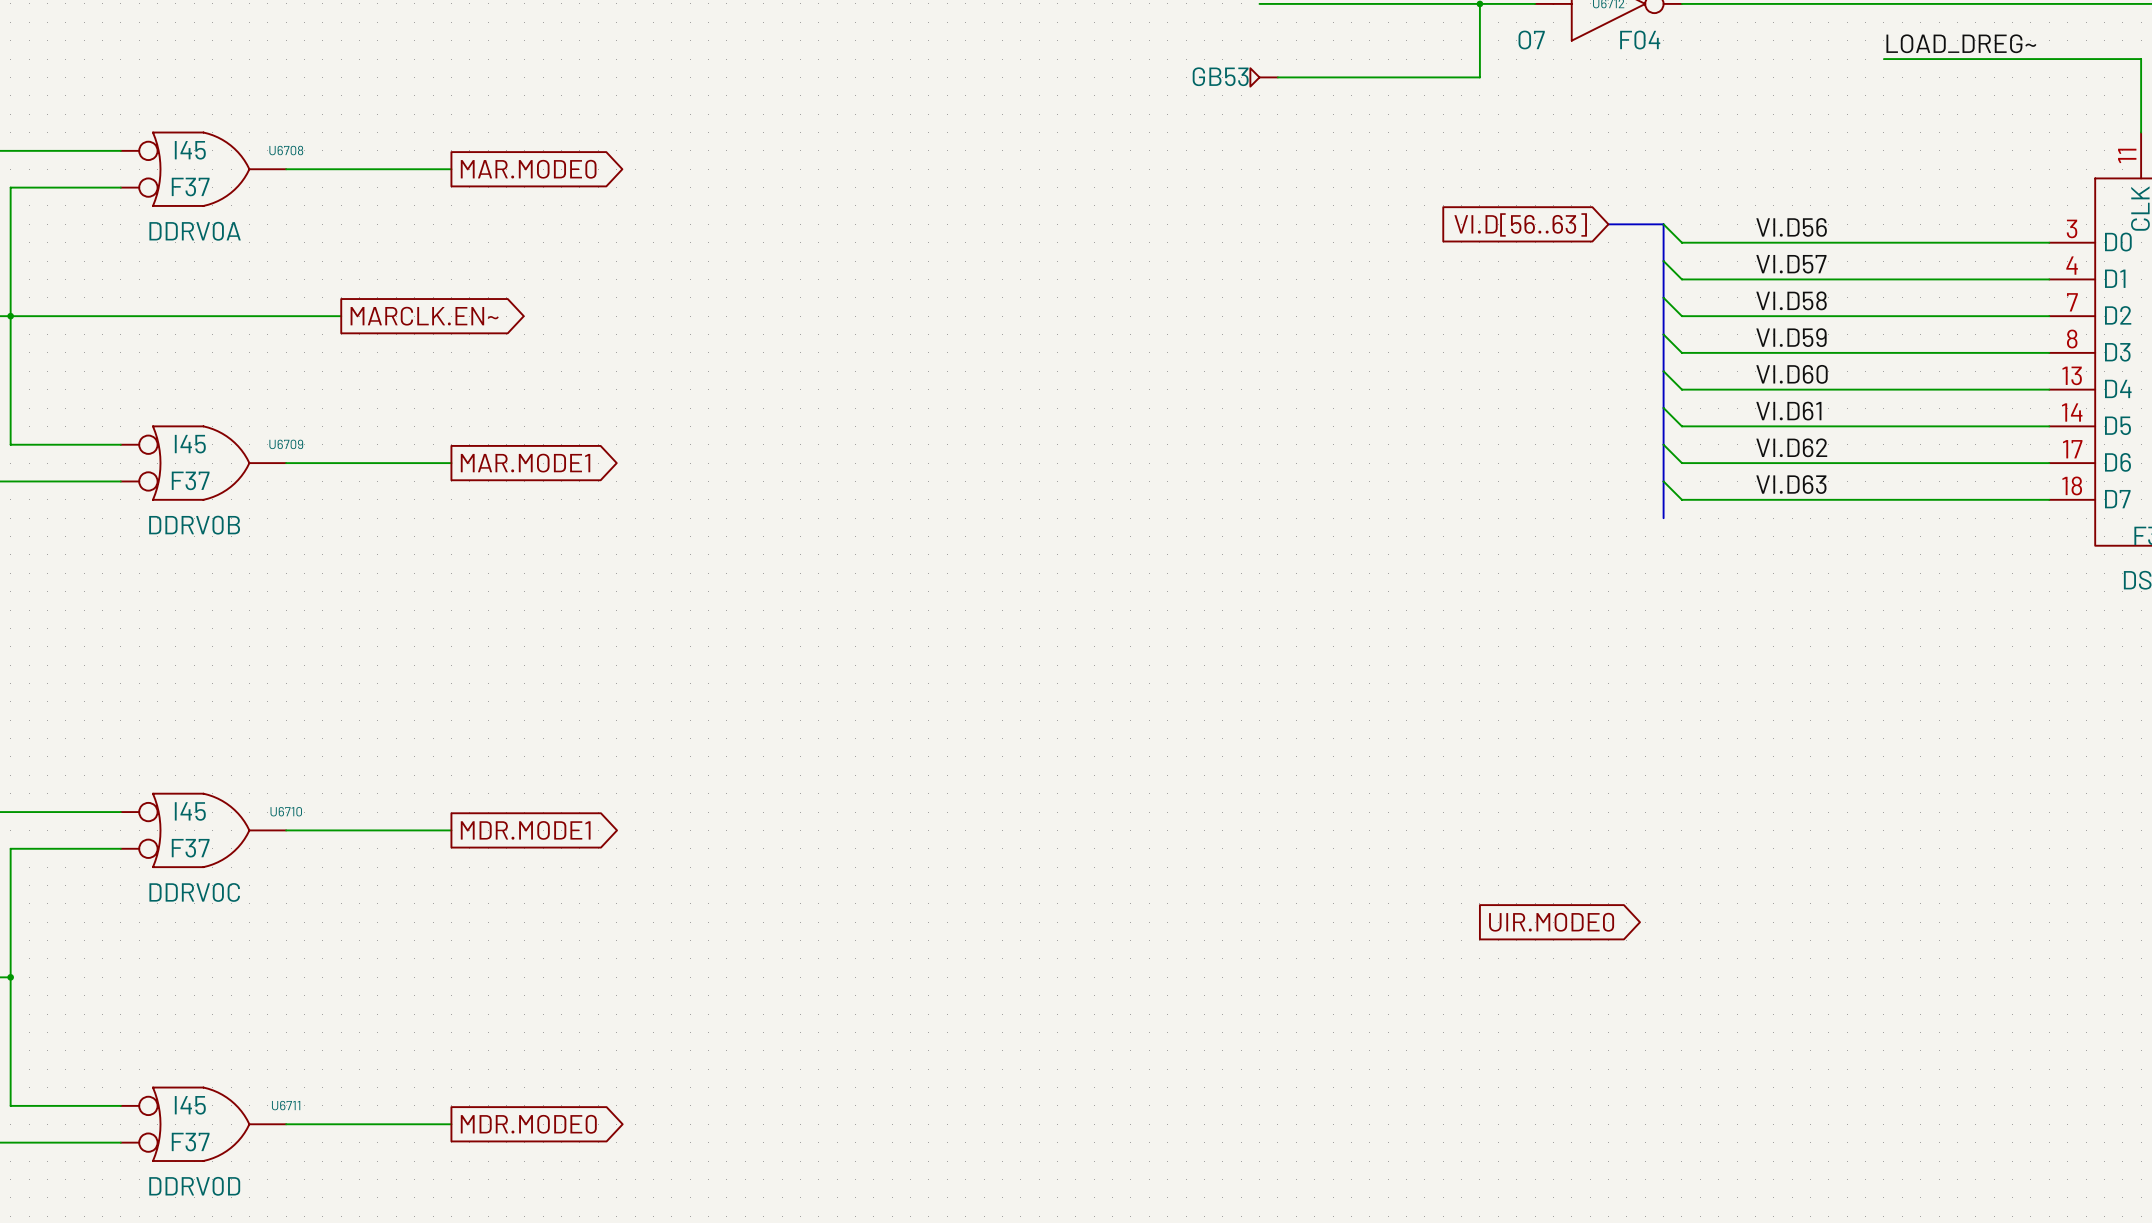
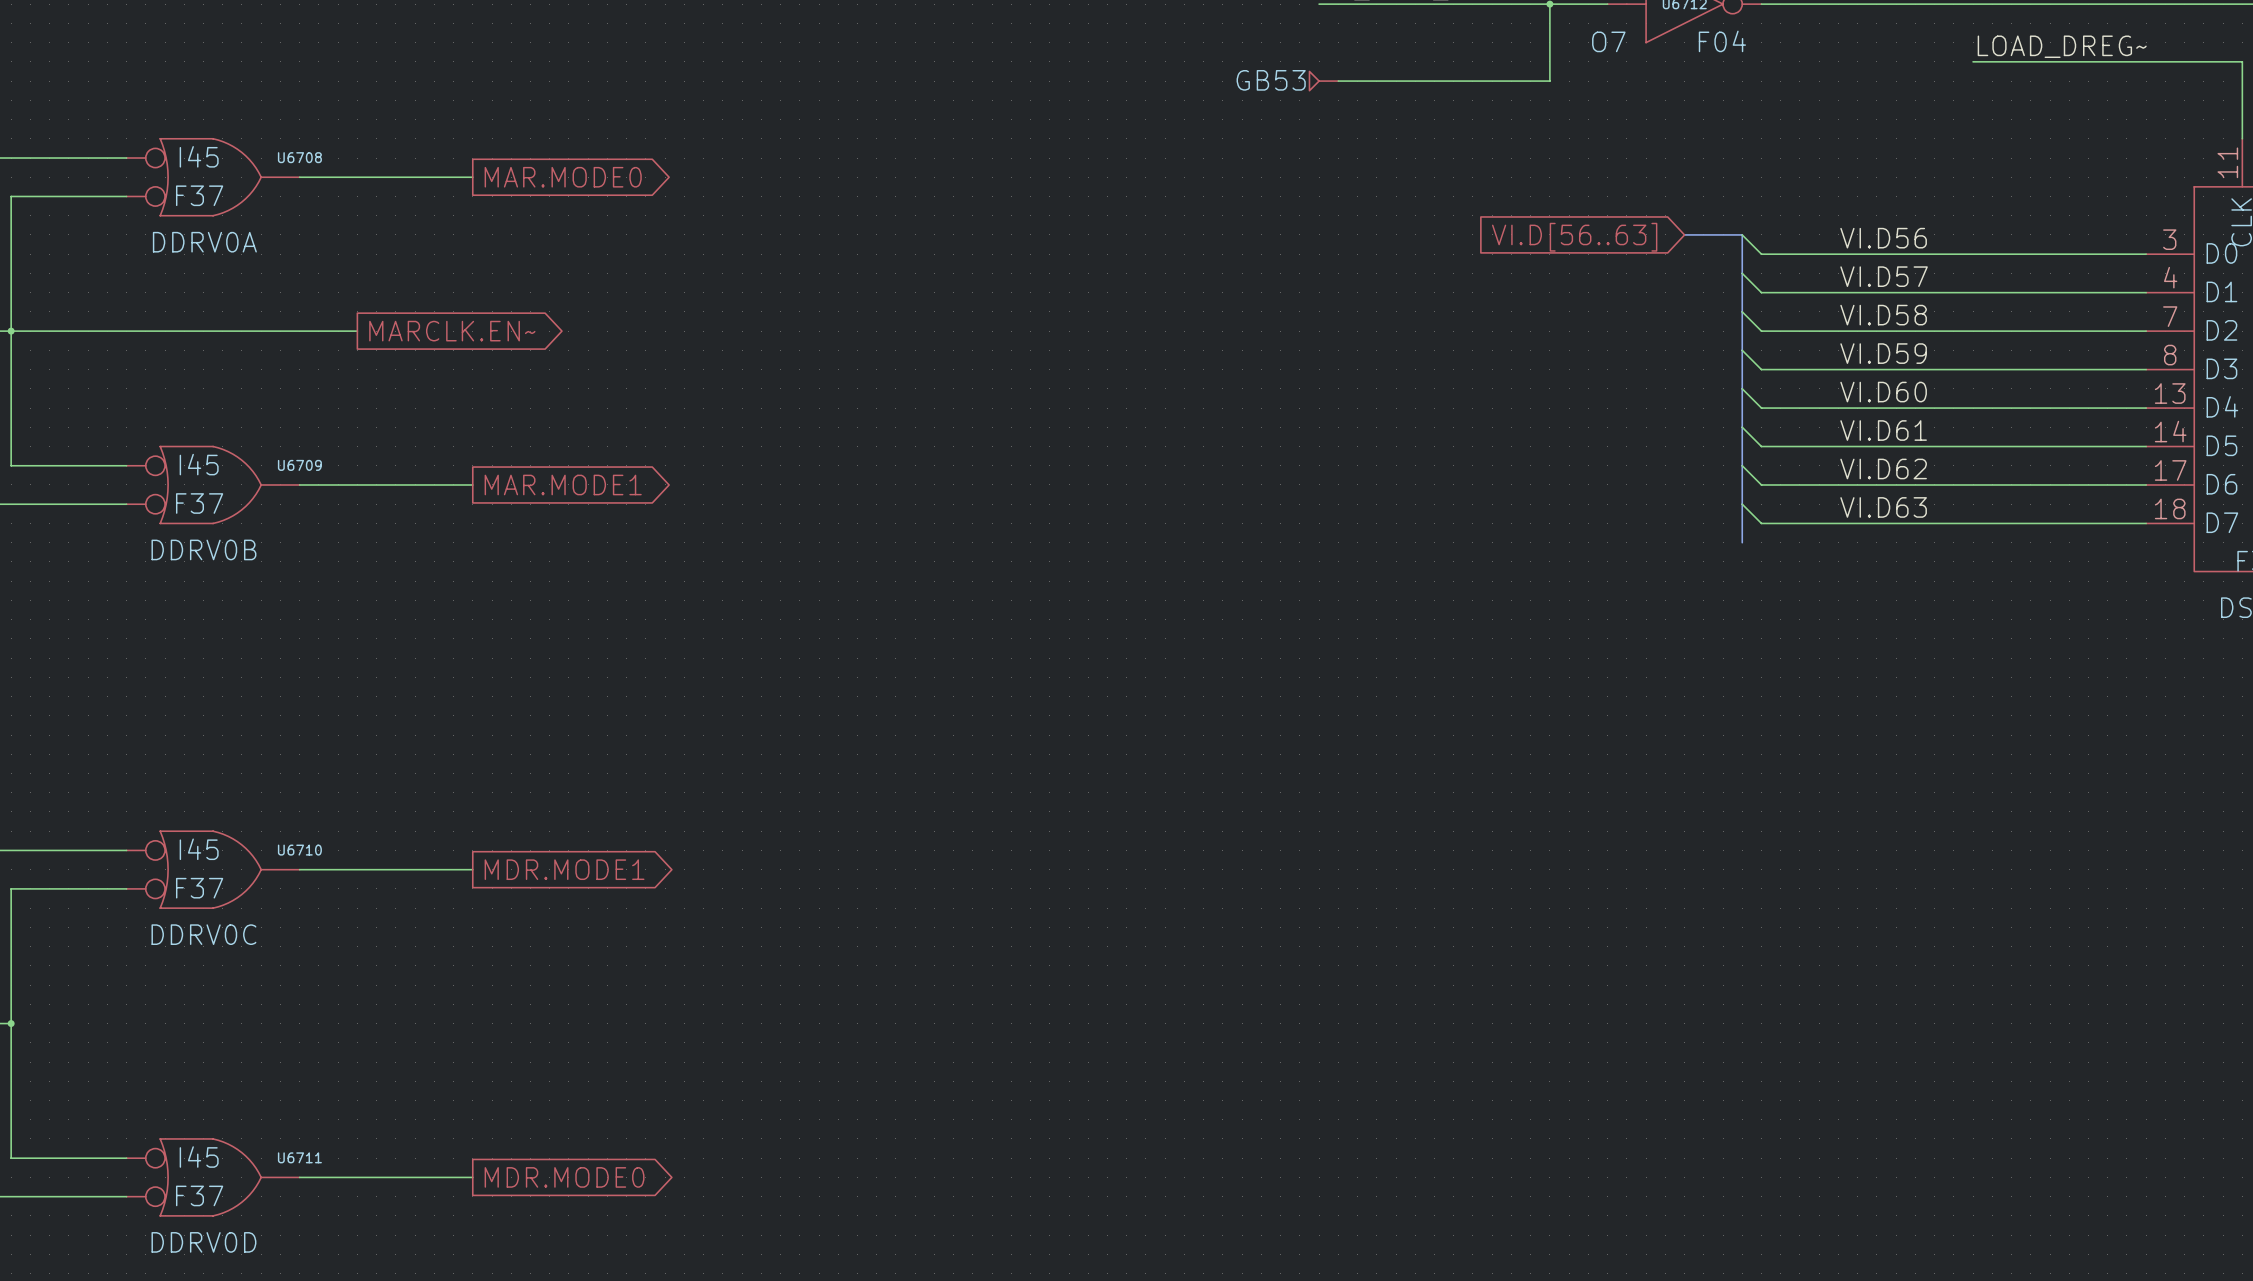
global label: UIR.MODE0 (1551, 922) -> none

